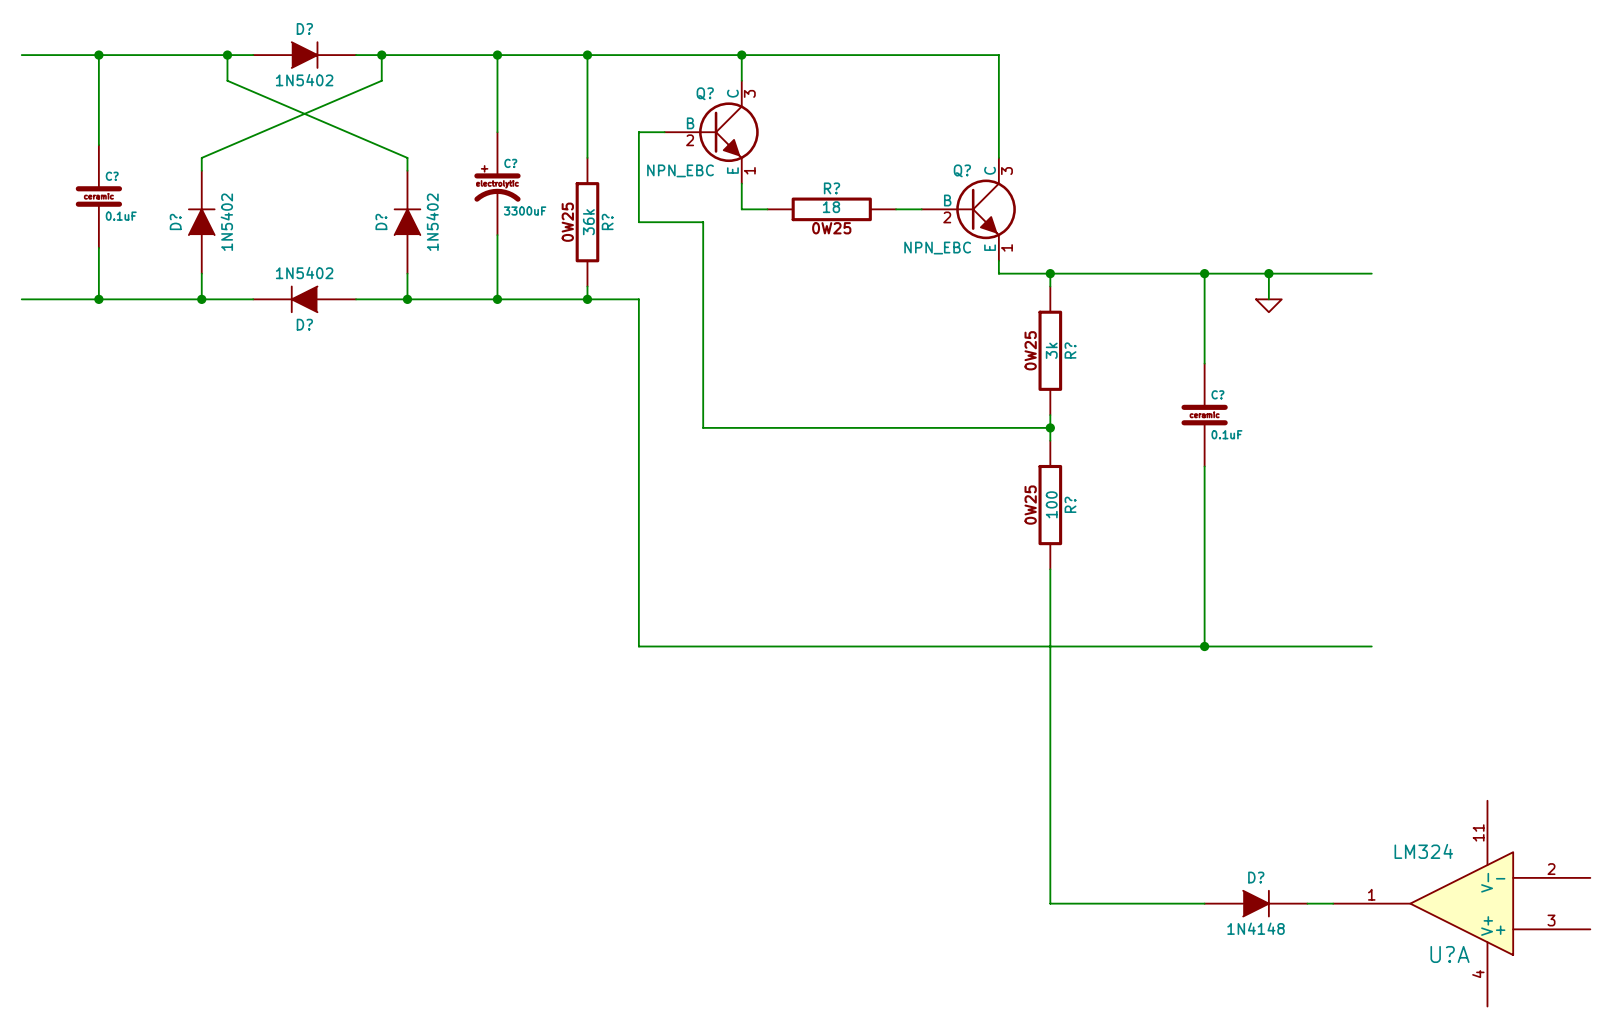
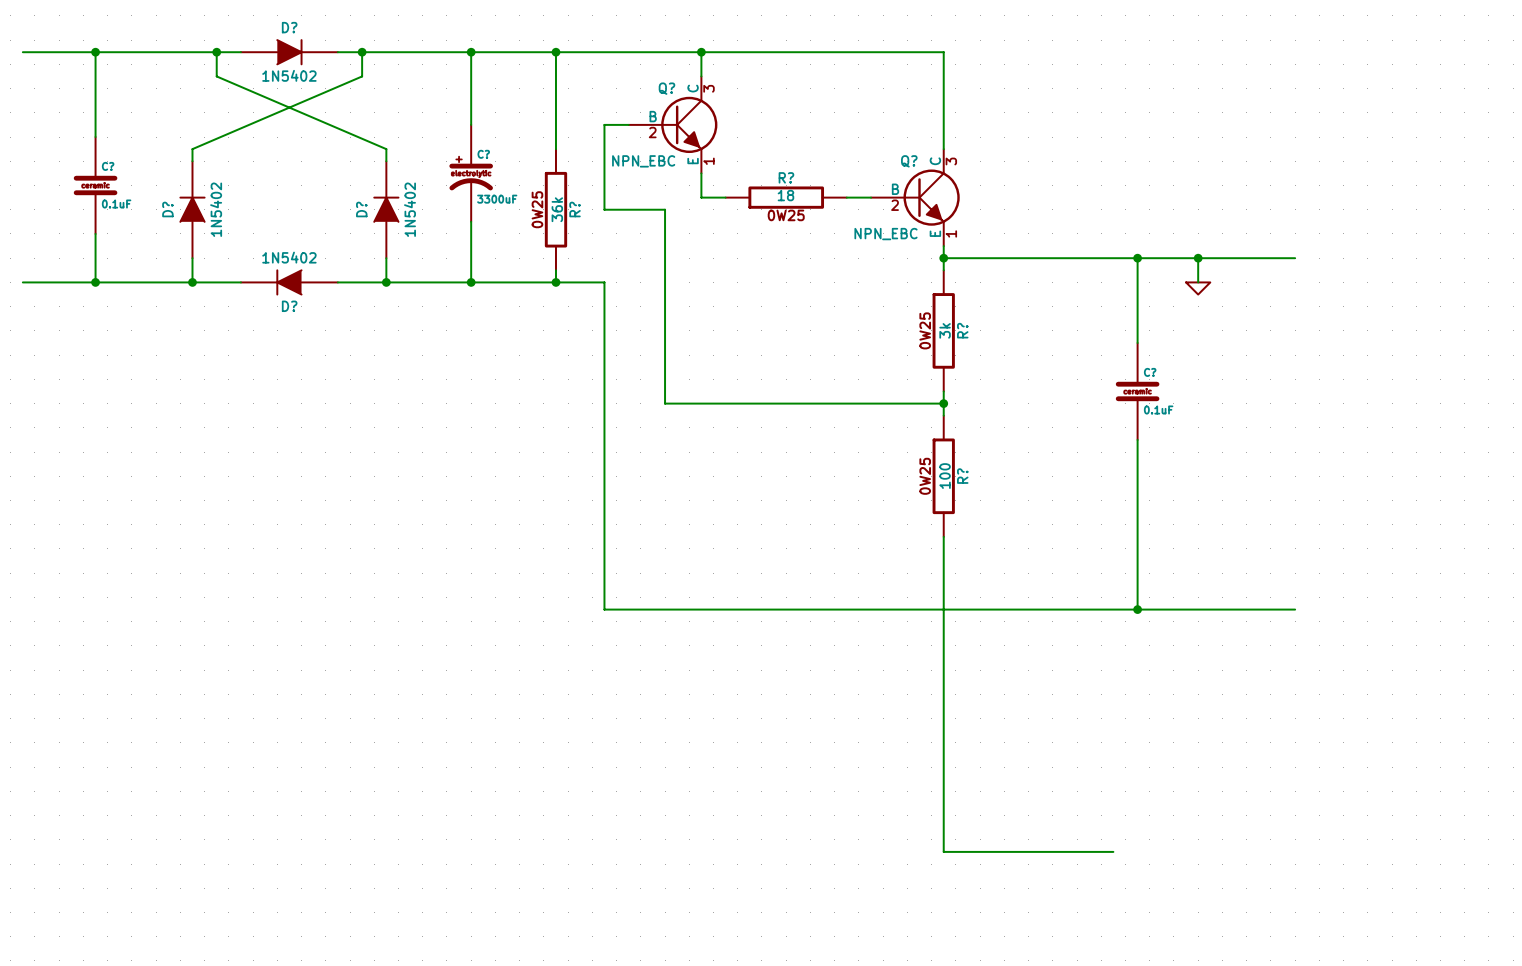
wire: (1050, 273) (1050, 286) -> (943, 258) (943, 270)
junction position: (1050, 273) -> (943, 258)
R? position: (1050, 350) -> (943, 330)
wire: (1050, 415) (1050, 440) -> (943, 391) (943, 415)
wire: (998, 427) (1050, 427) -> none
junction position: (1050, 427) -> (943, 403)
R? position: (1050, 505) -> (943, 476)
wire: (1050, 569) (1050, 903) -> (943, 536) (943, 851) (992, 851)
wire: (1178, 903) (1204, 903) -> none
D?: 1N4148 (1256, 903) -> none
wire: (1307, 903) (1333, 903) -> none
U?A: LM324 (1461, 903) -> none

